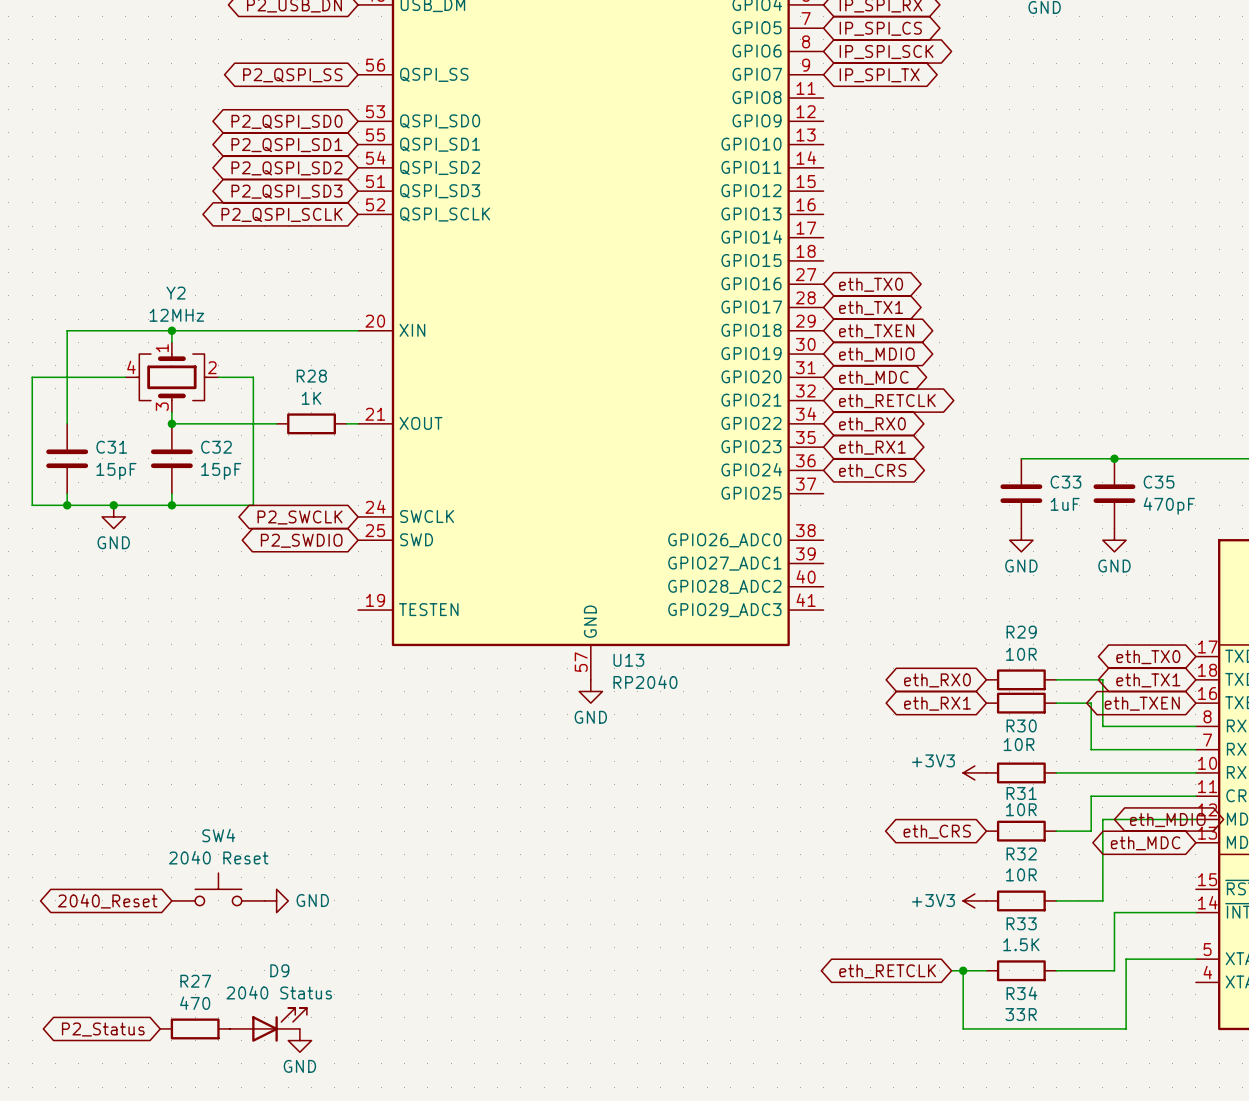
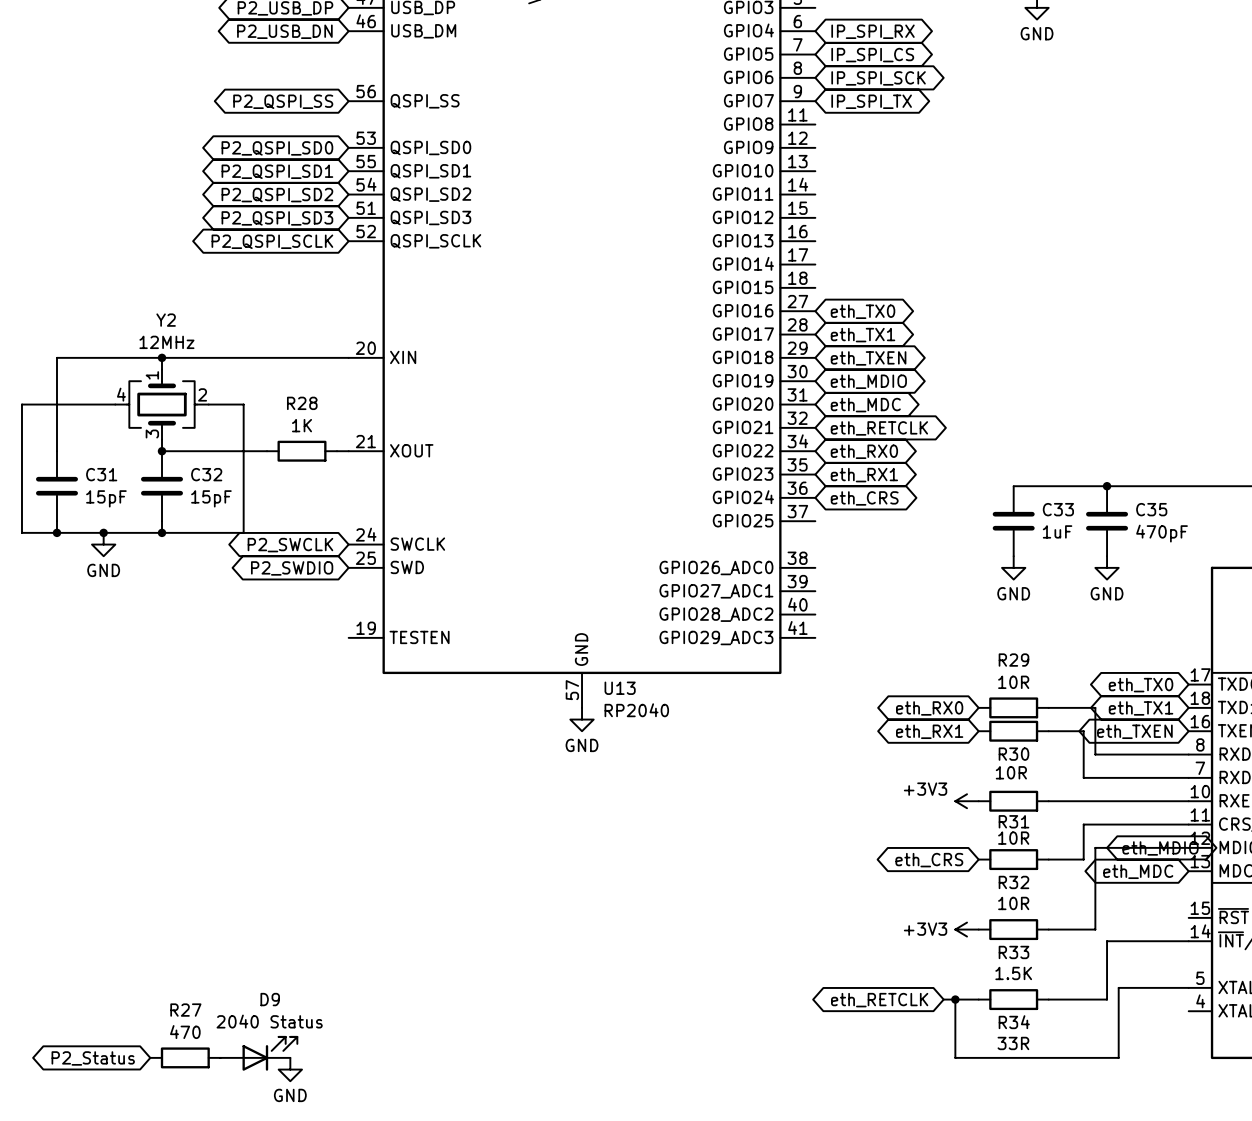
SW4: 2040 Reset (218, 889) -> none
power symbol: GND (276, 900) -> none
global label: 2040_Reset (107, 901) -> none

